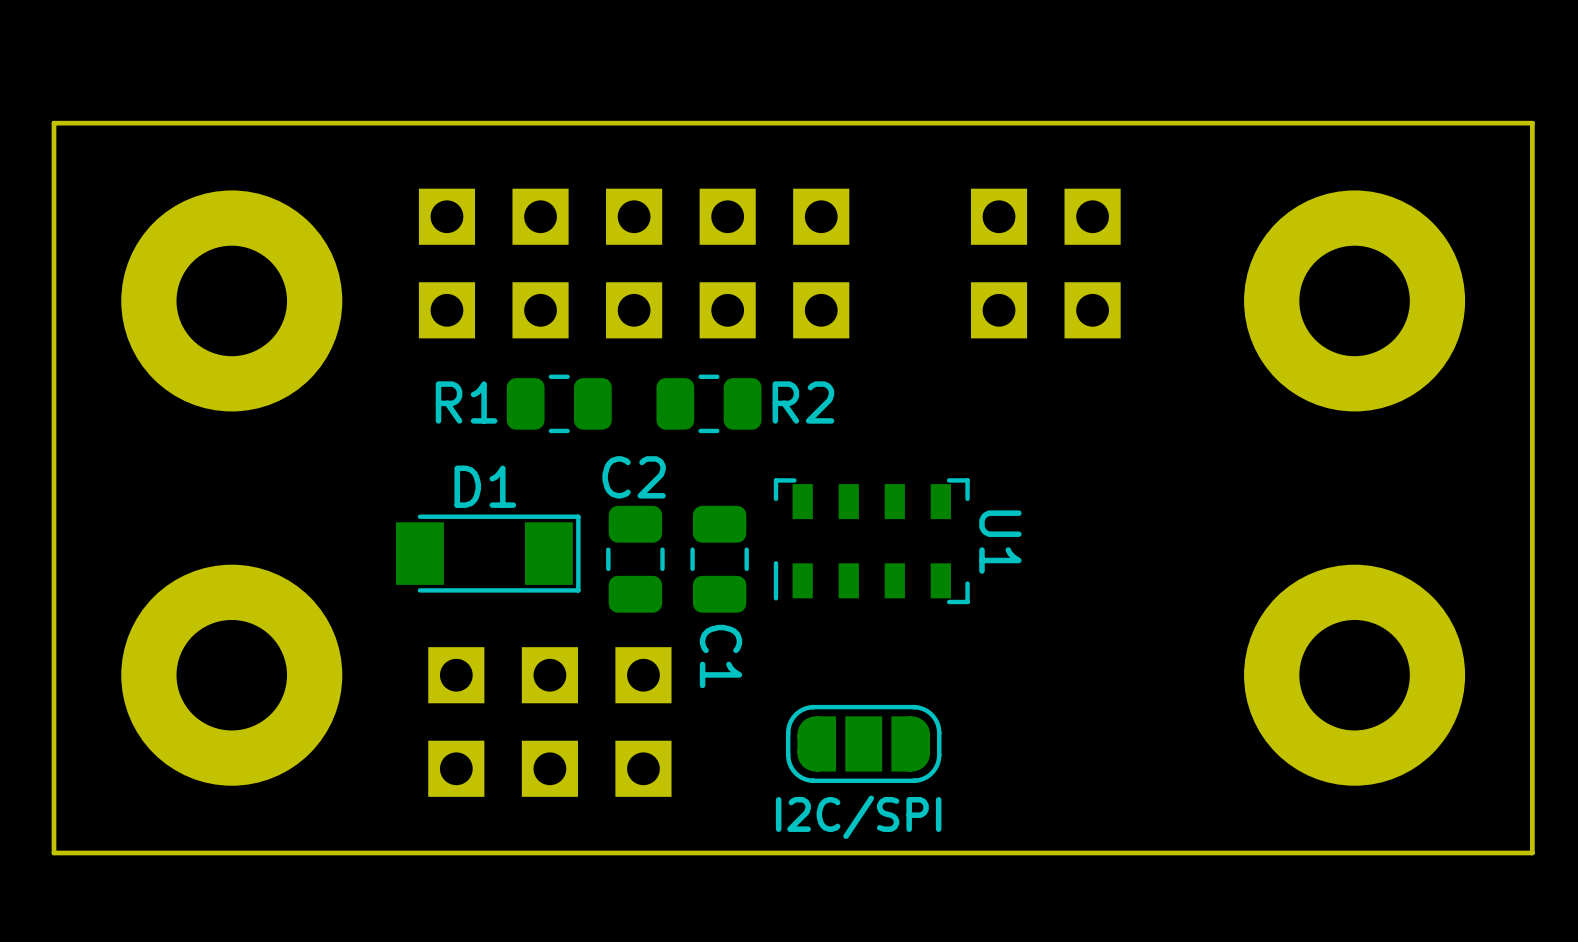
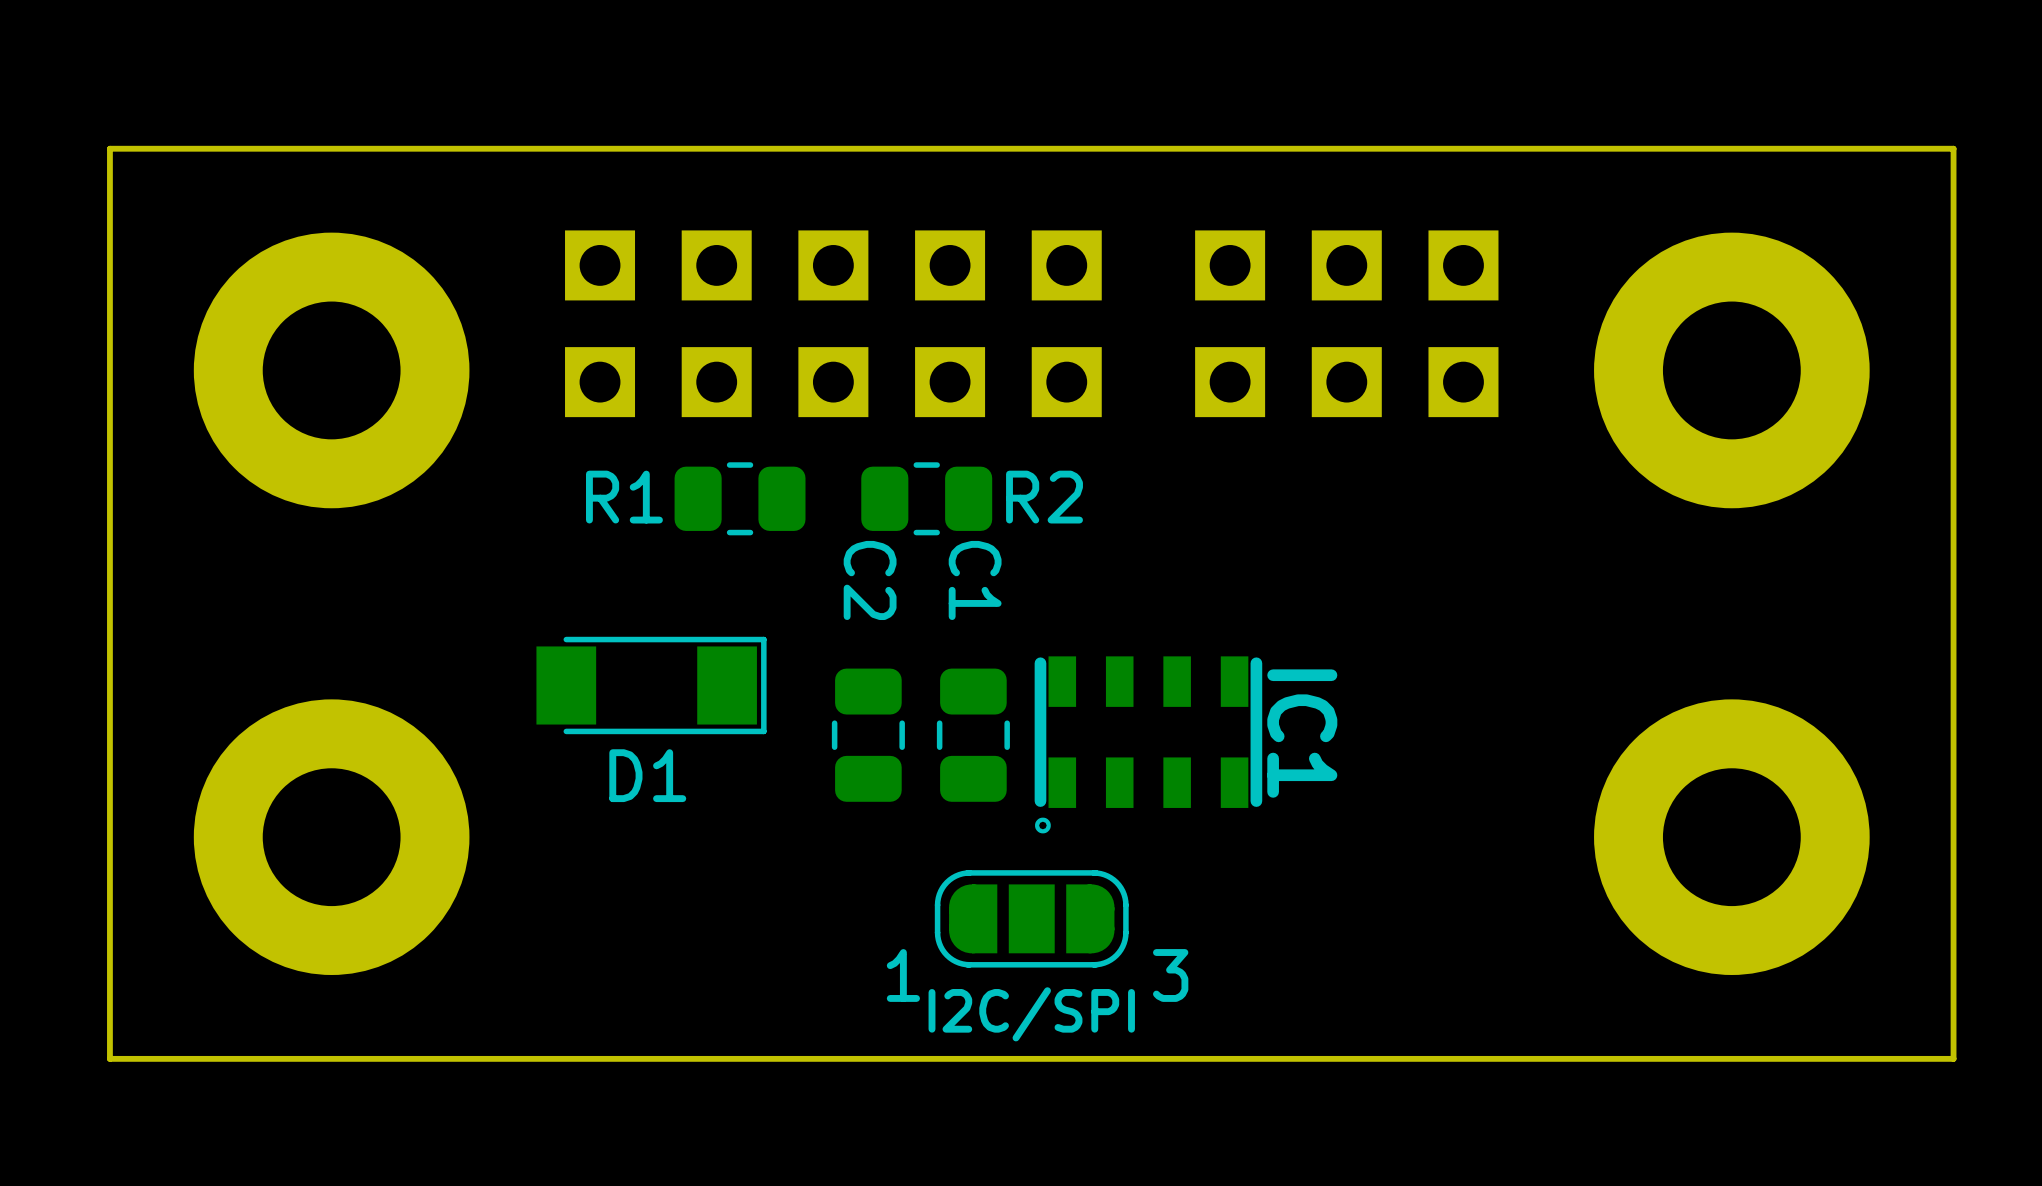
part footprint: [970, 188, 1121, 339] -> [1195, 230, 1499, 418]
C2 name rotation: 0° (634, 477) -> 90° clockwise (870, 580)
D1 name position: D1 (485, 486) -> D1 (647, 775)
U1: (871, 541) -> none
C2 position: (635, 559) -> (868, 735)
C1 position: (719, 559) -> (973, 735)
IC1: none -> (1148, 744)
C1 name position: C1 (721, 656) -> C1 (975, 580)
part: (549, 722) -> none
part: none -> (1031, 918)
part: (863, 743) -> none
text position: I2C/SPI (858, 817) -> I2C/SPI (1031, 1014)

